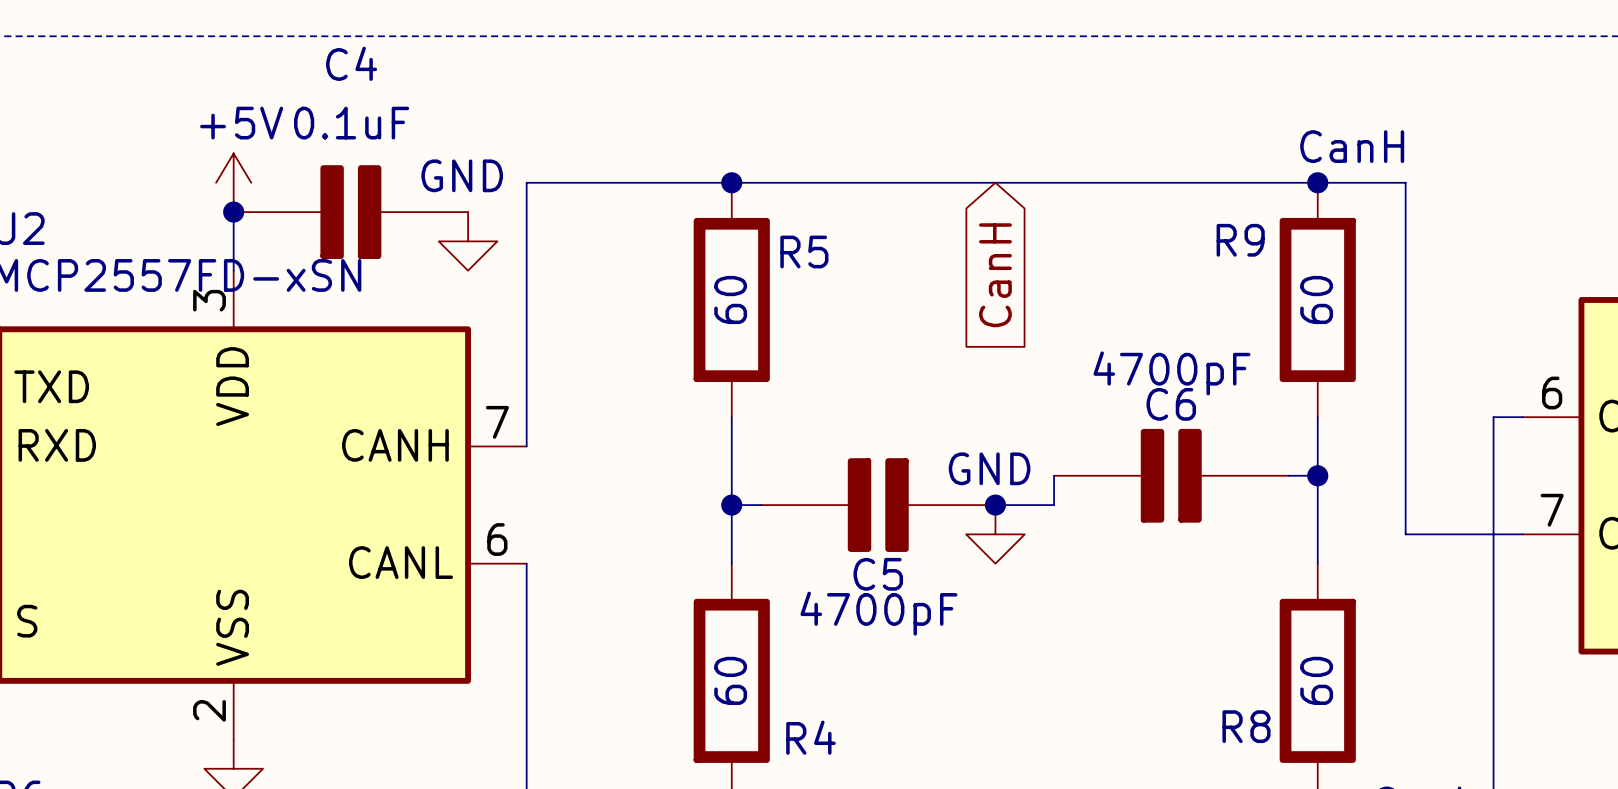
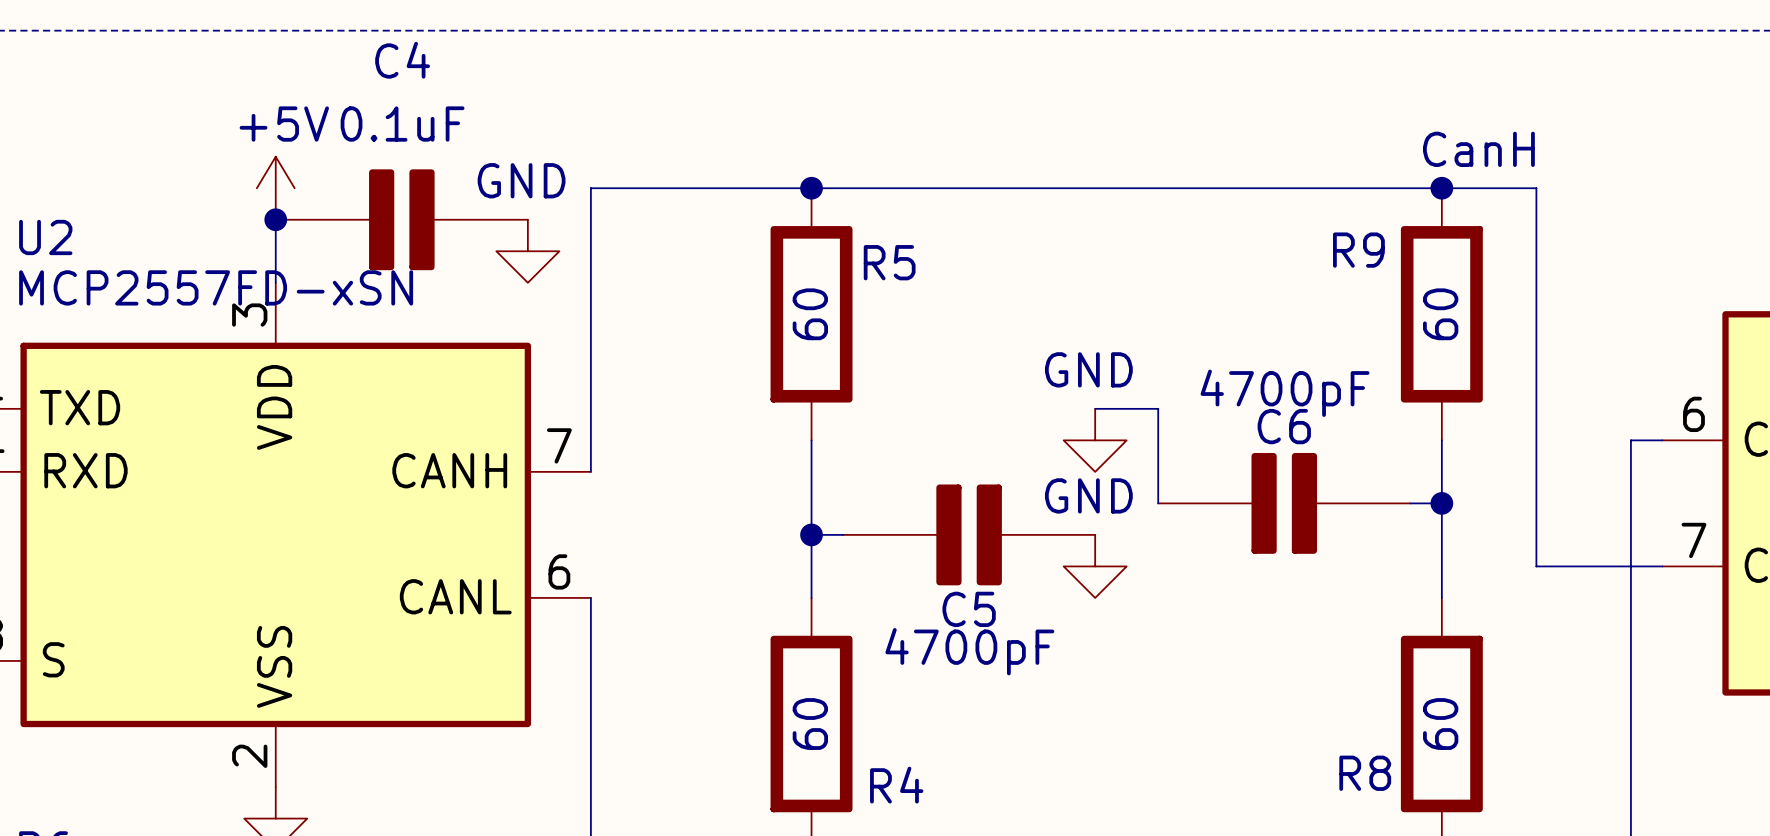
global label: CanH (995, 275) -> none
power symbol: none -> GND (1095, 440)
wire: (1054, 475) (1054, 505) (995, 505) -> (1158, 503) (1158, 408) (1095, 408)
junction: (995, 505) -> none

